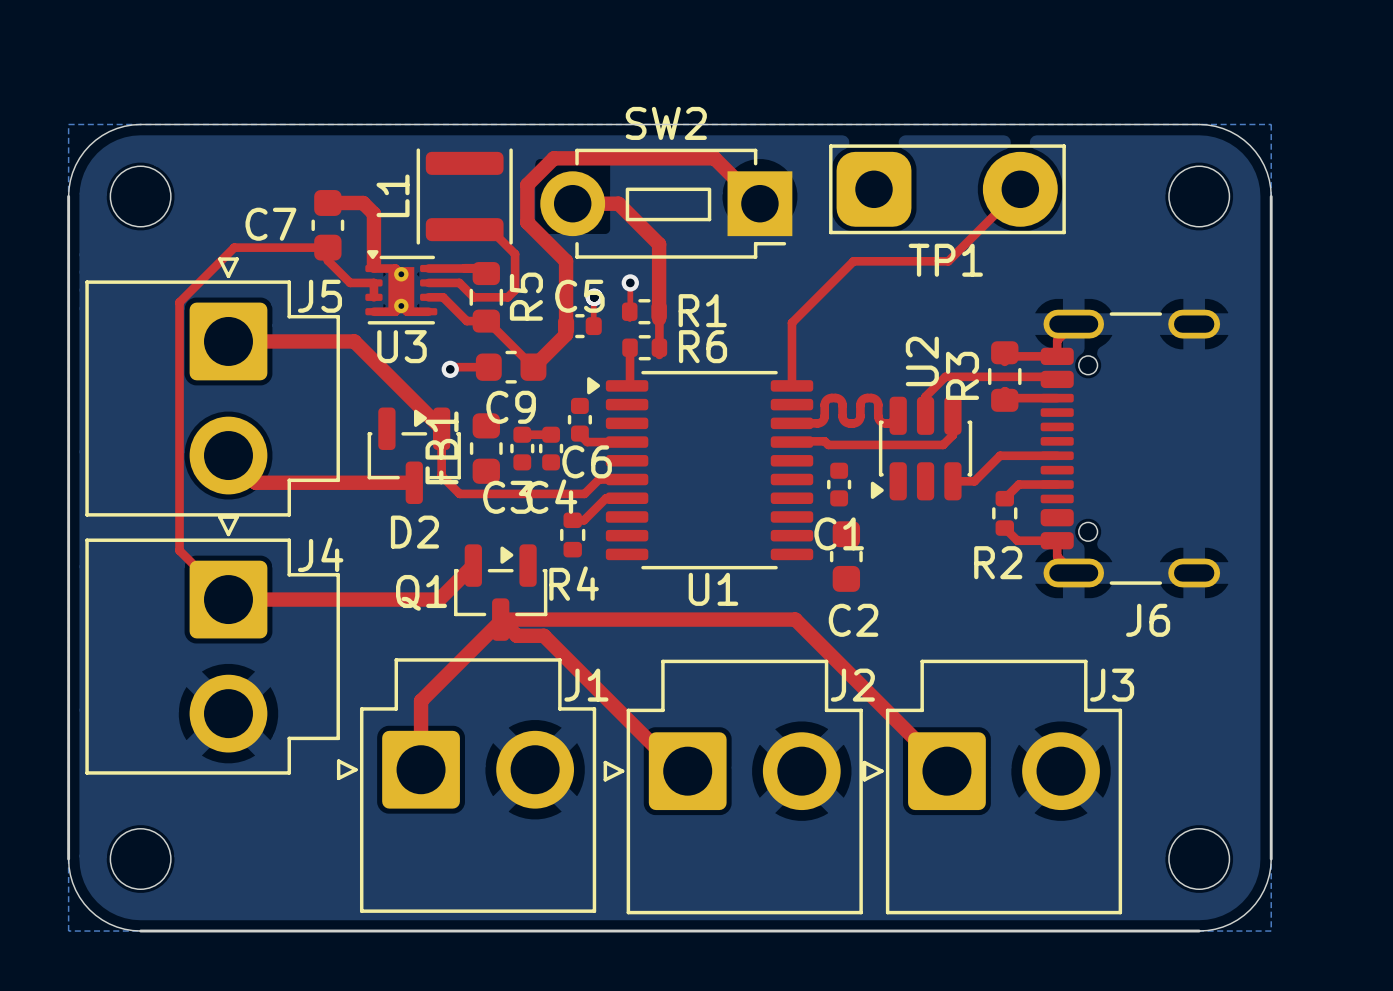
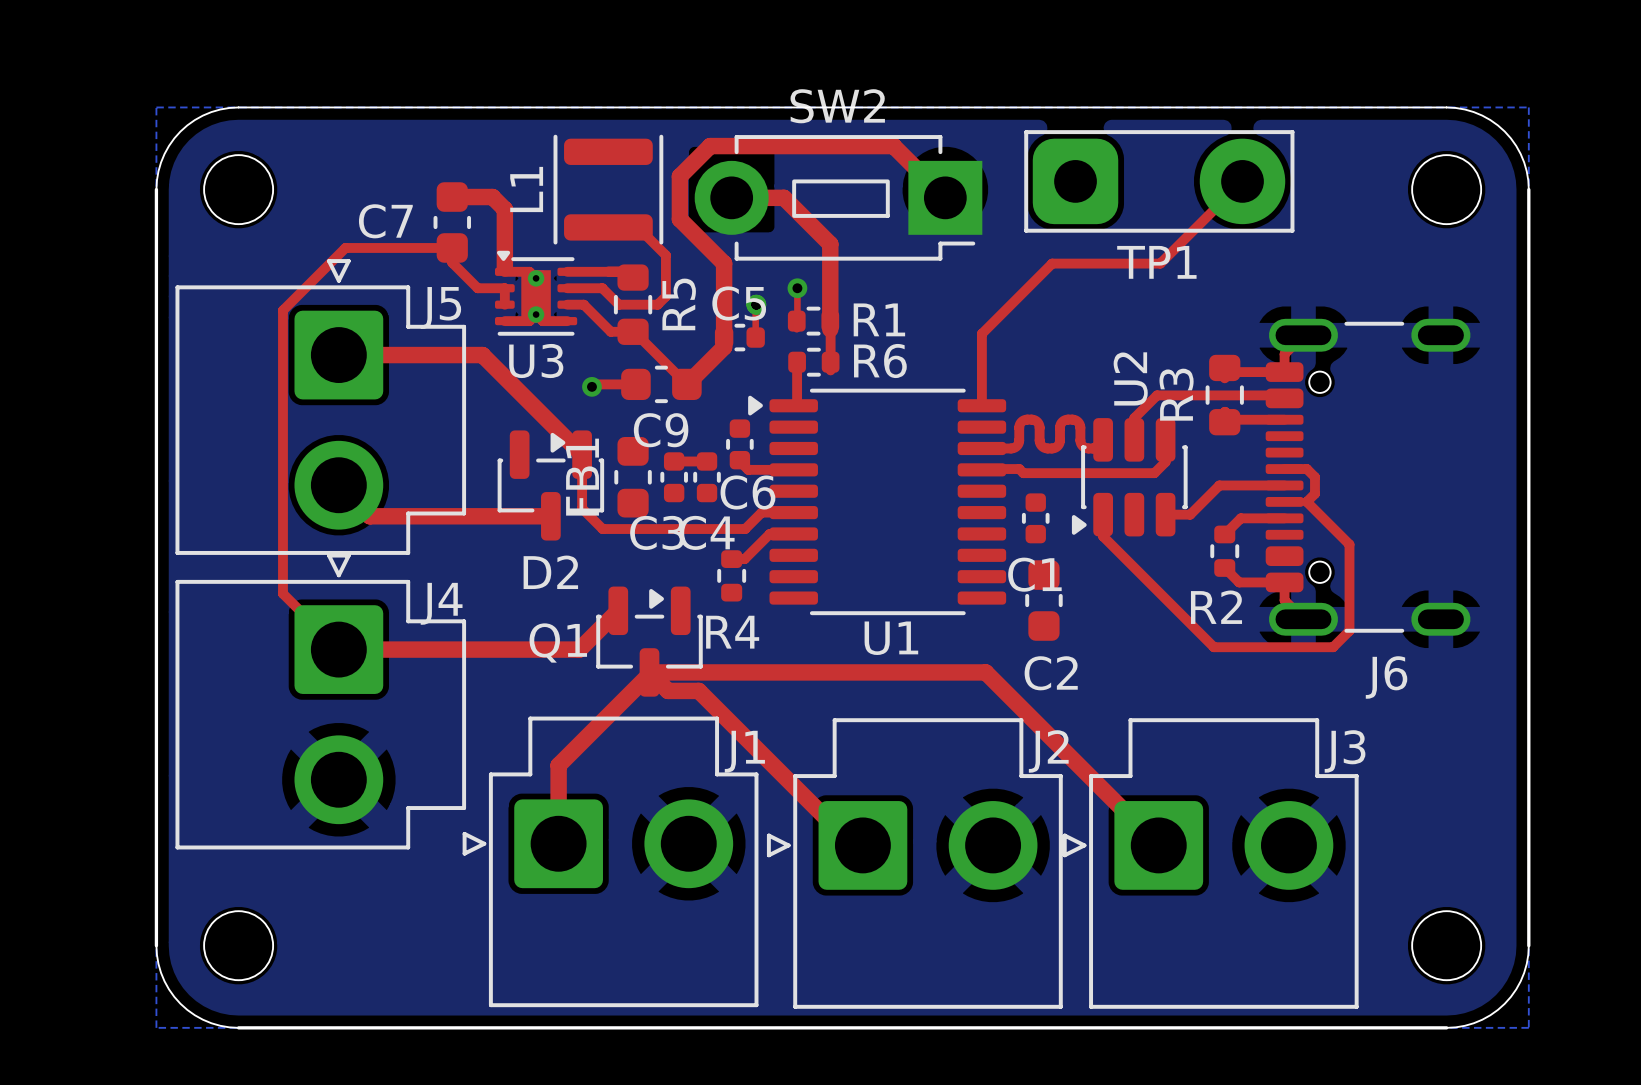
top track: none -> (1284, 469) (1306, 469) (1314, 477) (1314, 493) (1306, 501) (1349, 544) (1349, 630) (1333, 647) (1213, 647) (1103, 536) (1103, 514)

